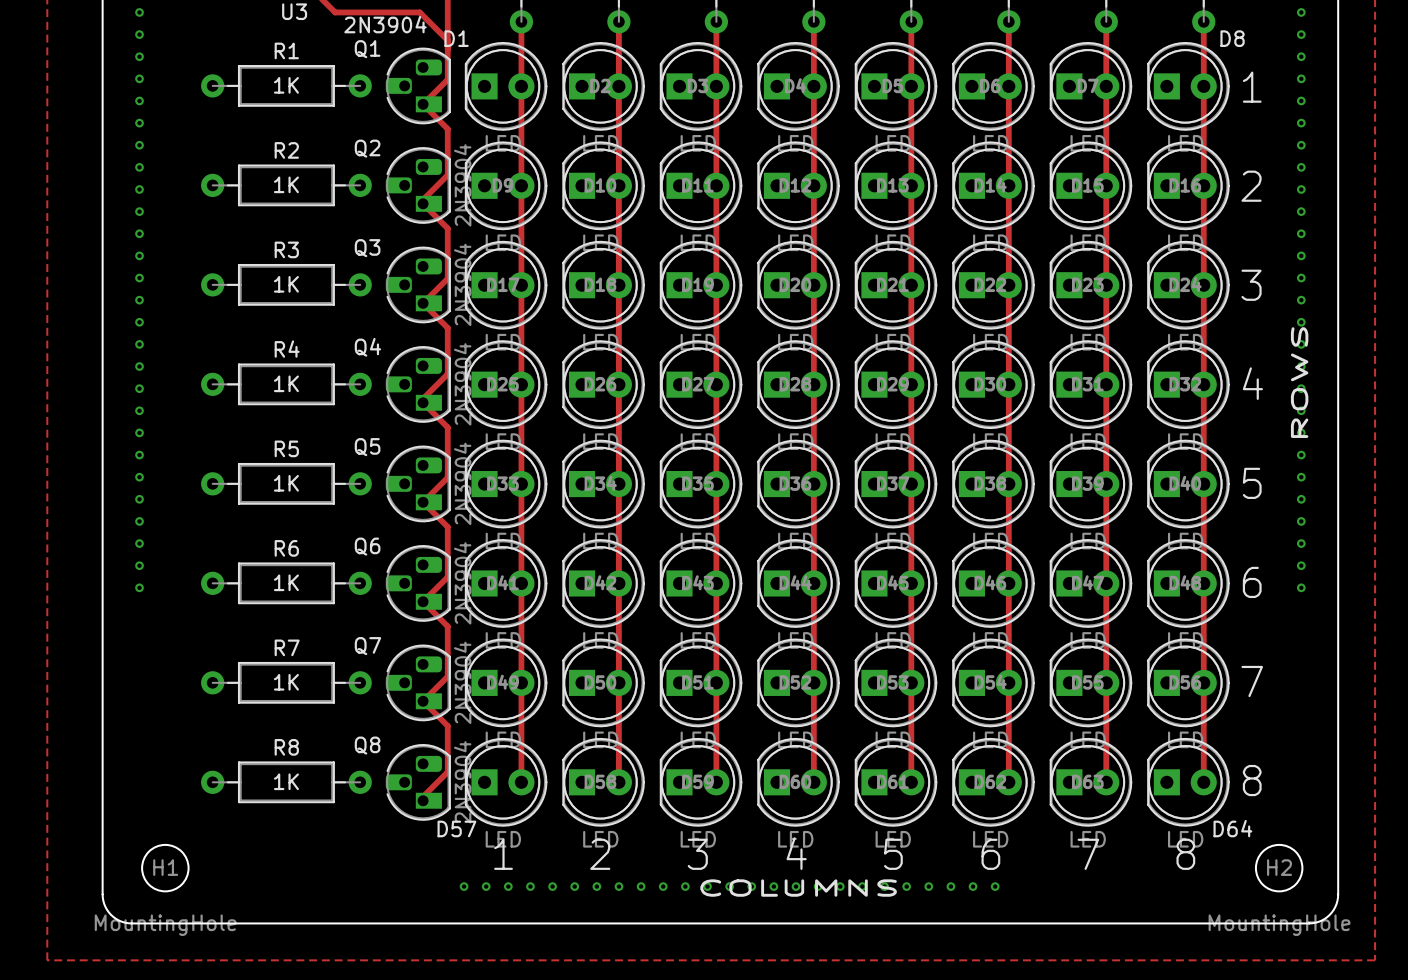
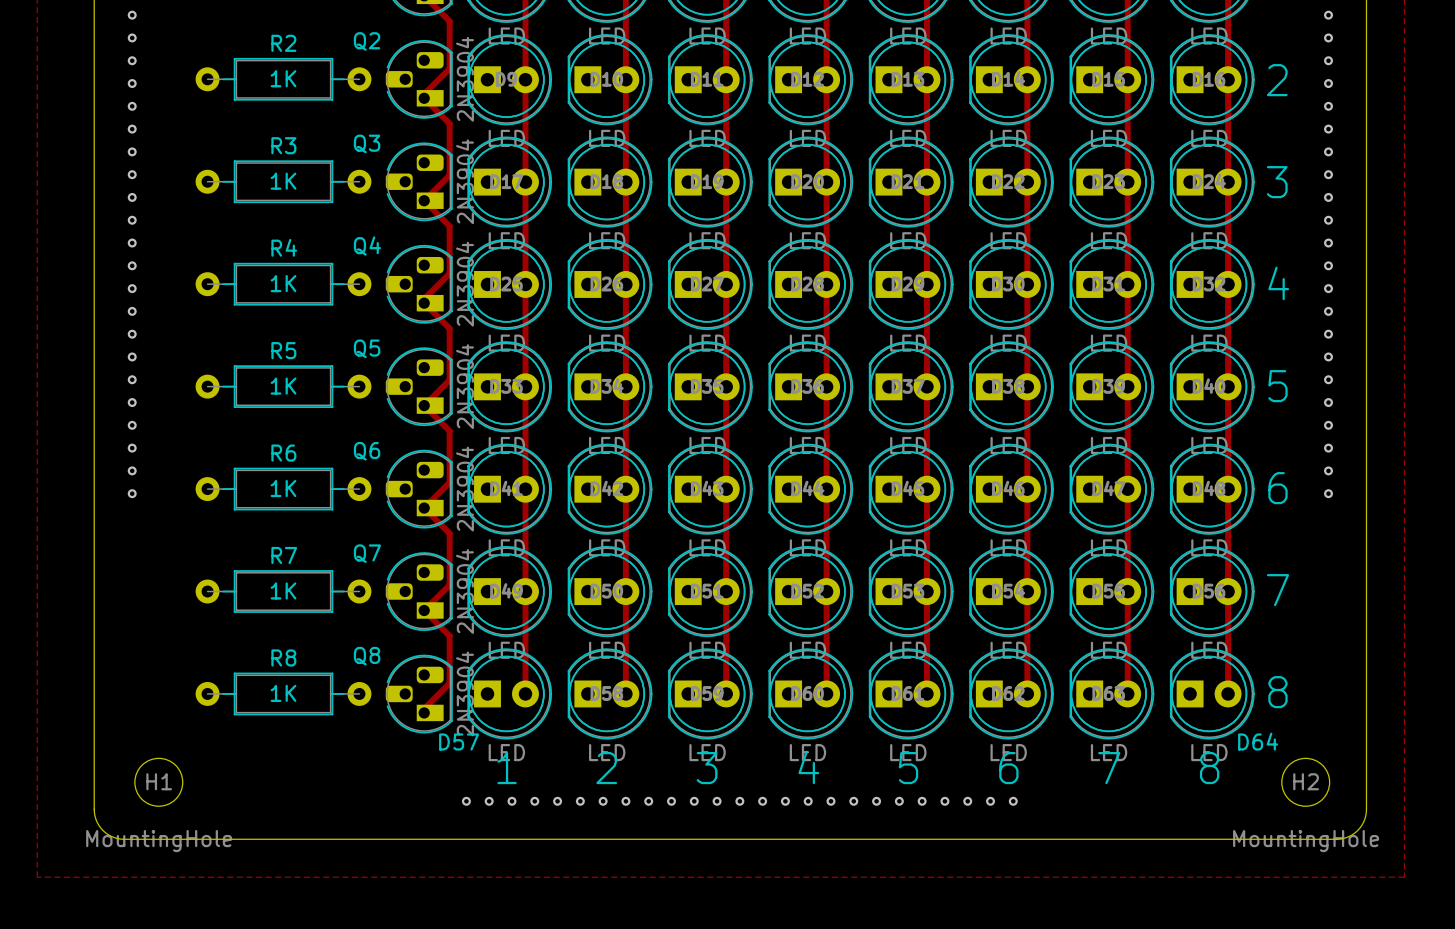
text: ROWS (1299, 382) -> none
text: COLUMNS (798, 888) -> none

